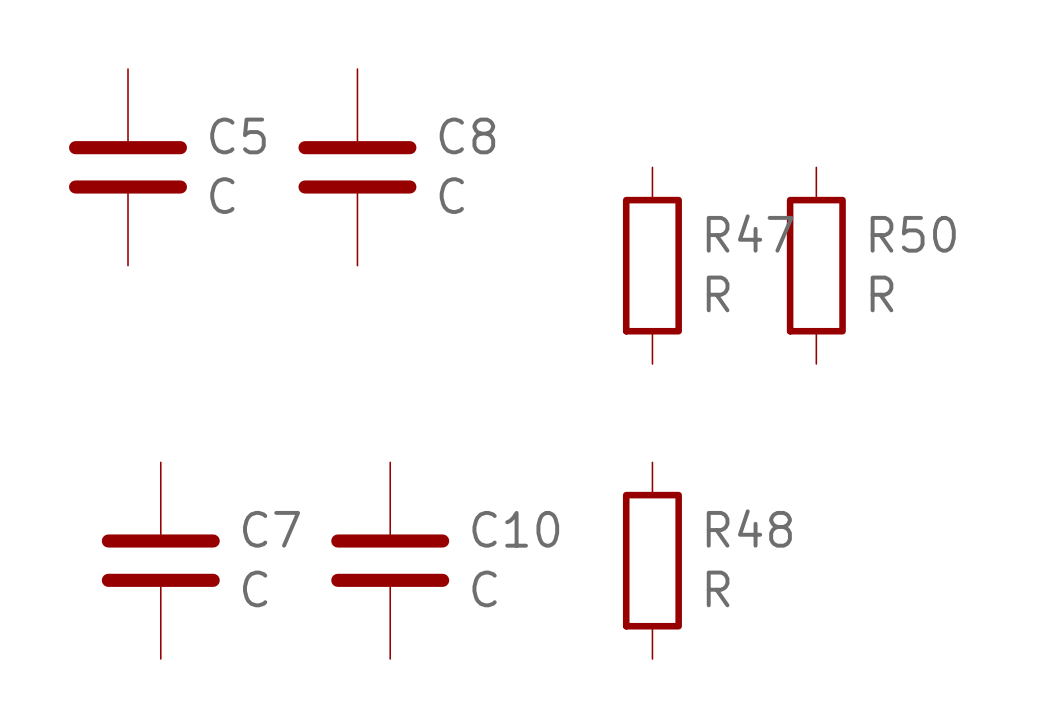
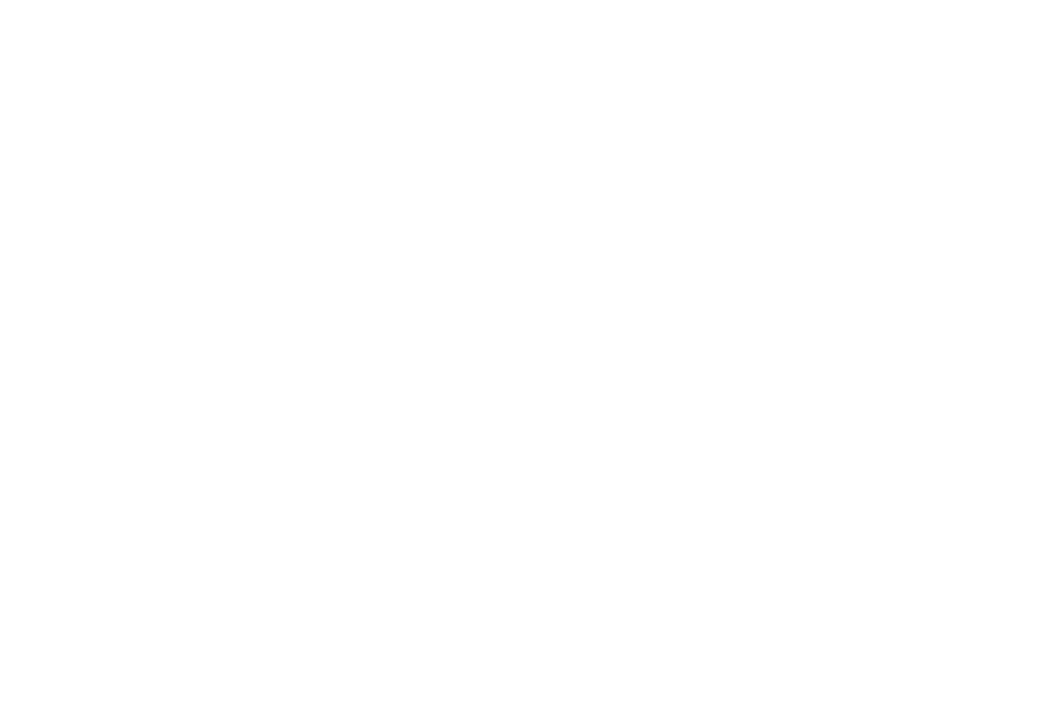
C5: C (128, 167) -> none
C8: C (357, 167) -> none
R47: R (652, 265) -> none
R50: R (816, 265) -> none
C7: C (160, 560) -> none
C10: C (390, 560) -> none
R48: R (652, 560) -> none

